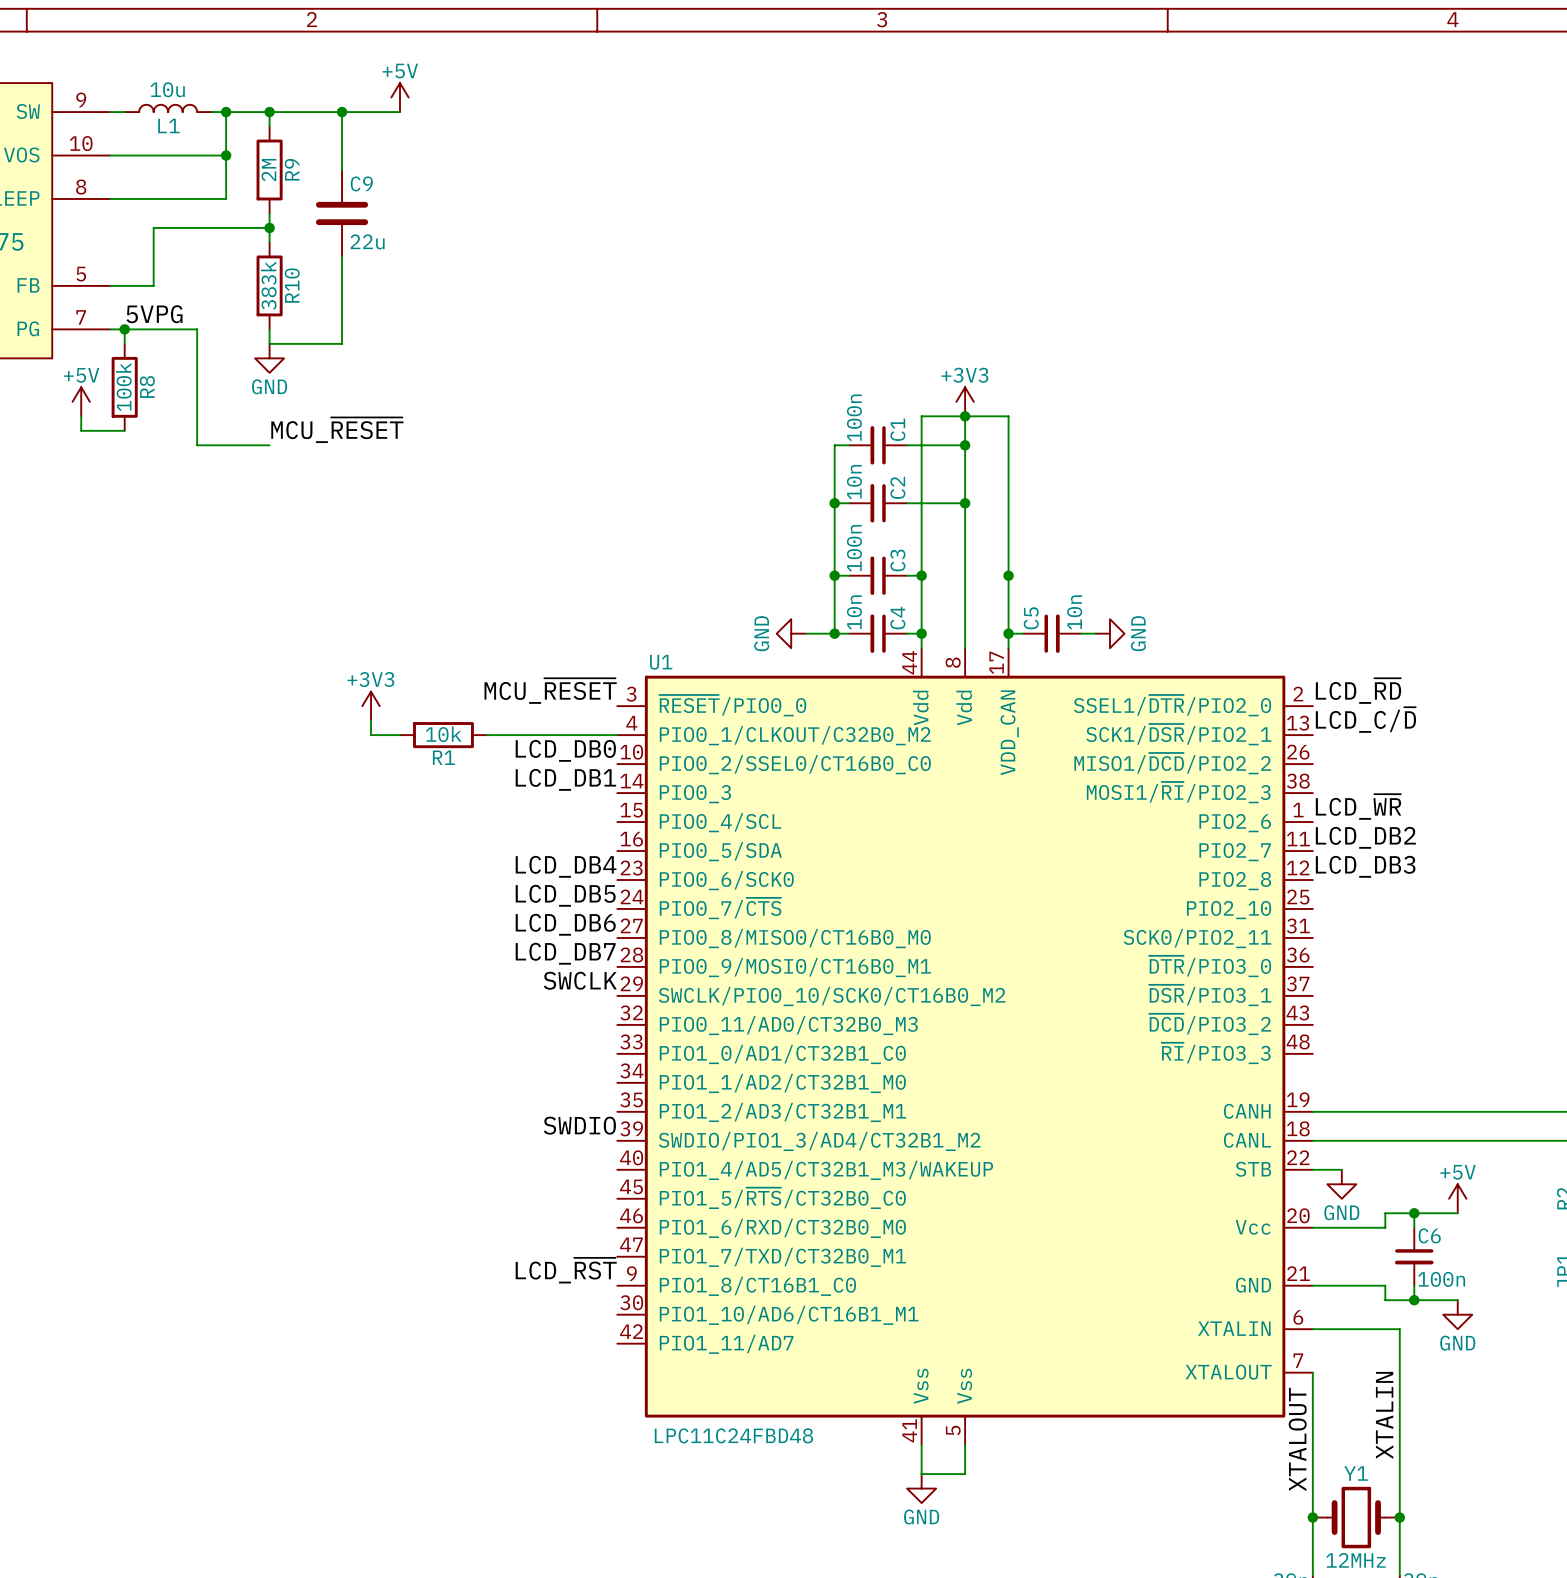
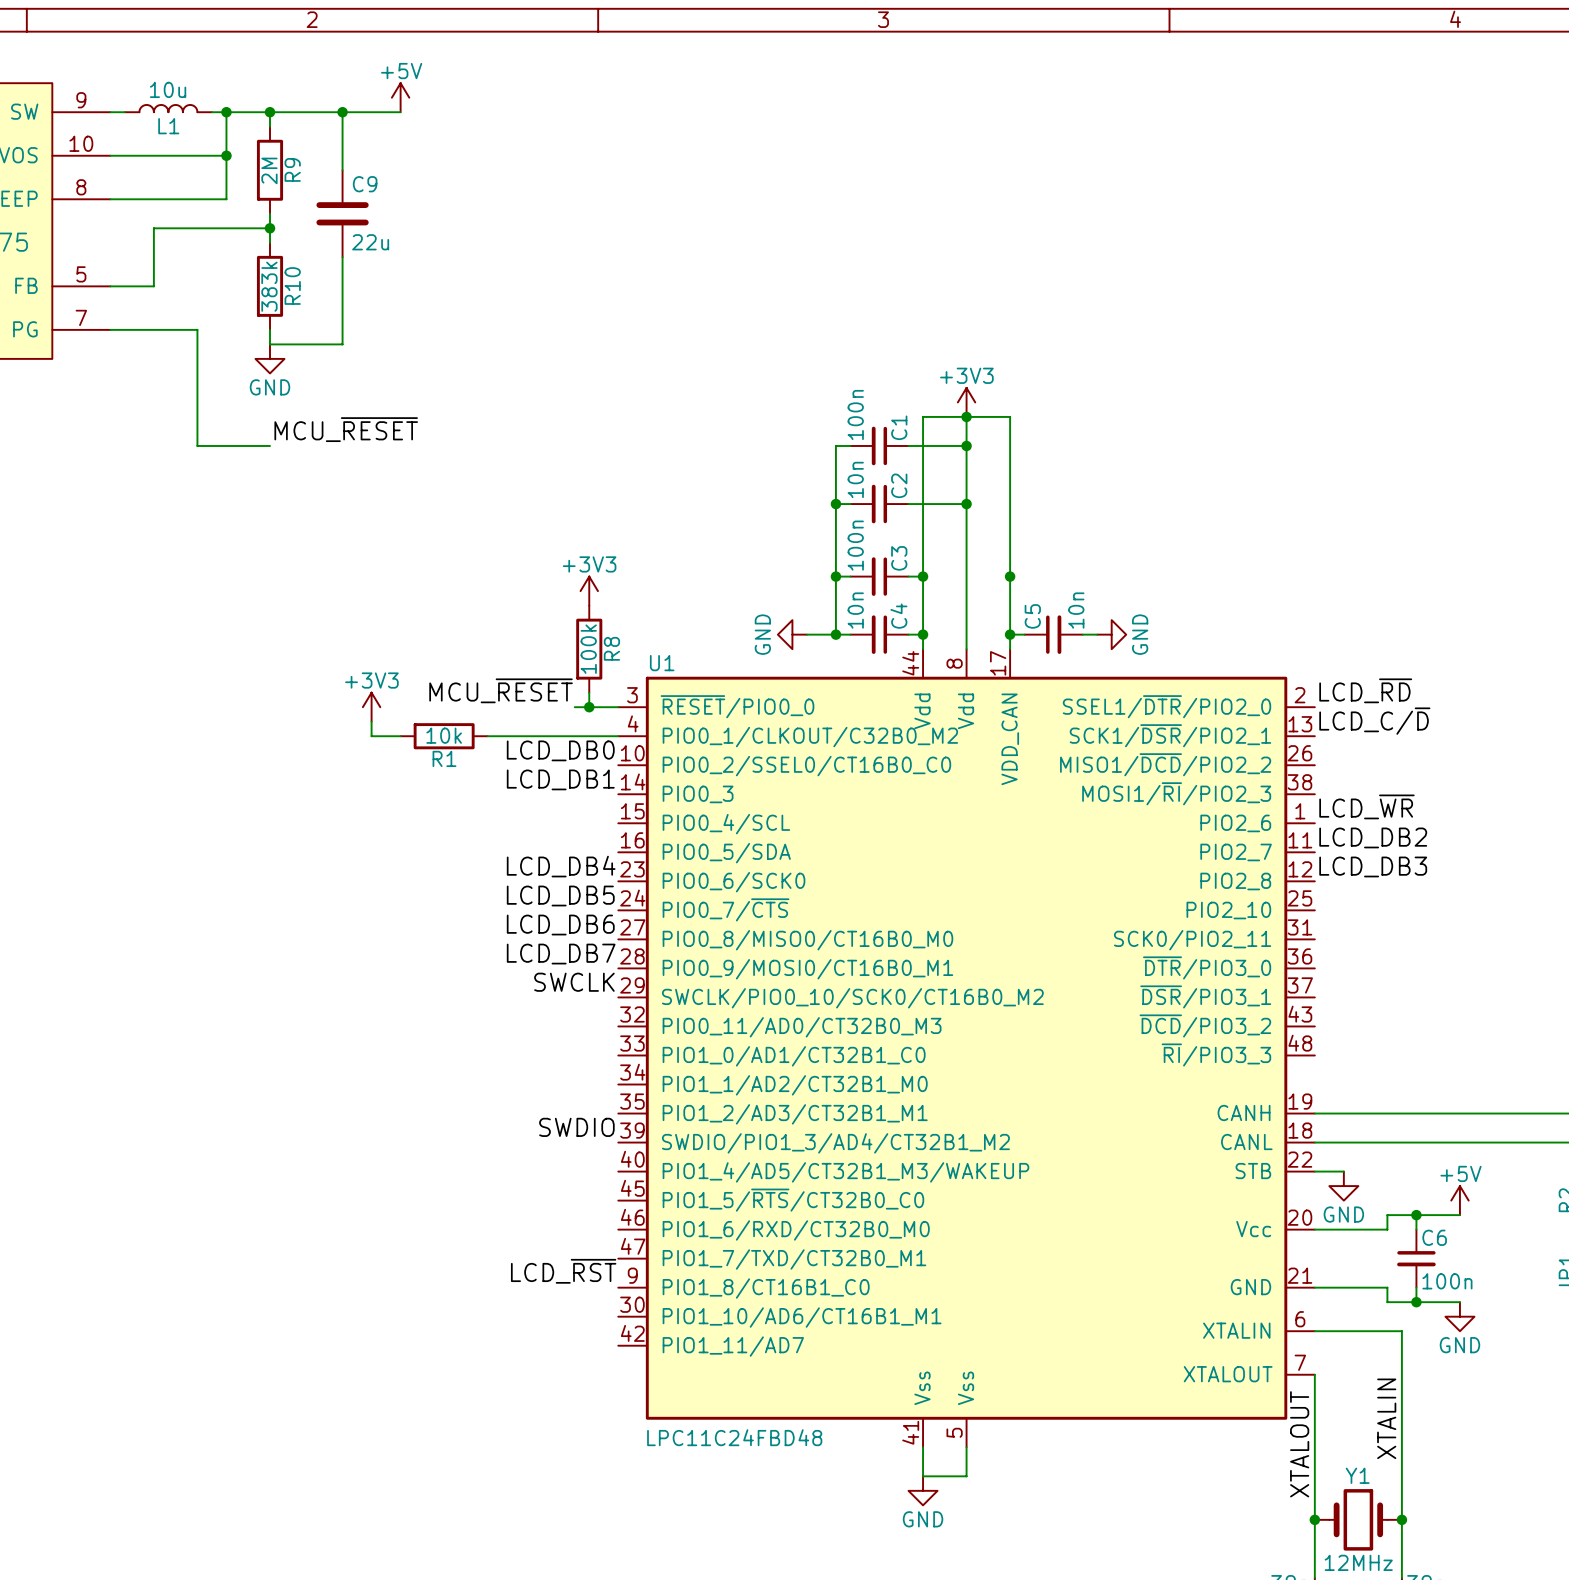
label: 5VPG (154, 314) -> none
wire: (124, 329) (124, 343) -> none
junction: (124, 329) -> none
R8 position: (124, 387) -> (589, 649)
power symbol: +5V (81, 401) -> none
wire: (81, 416) (81, 430) (124, 430) -> none
power symbol: none -> +3V3 (589, 591)
label position: MCU_~{RESET} (550, 691) -> MCU_~{RESET} (501, 690)
wire: none -> (589, 692) (589, 707)
wire: none -> (574, 707) (618, 707)
junction: none -> (589, 707)

